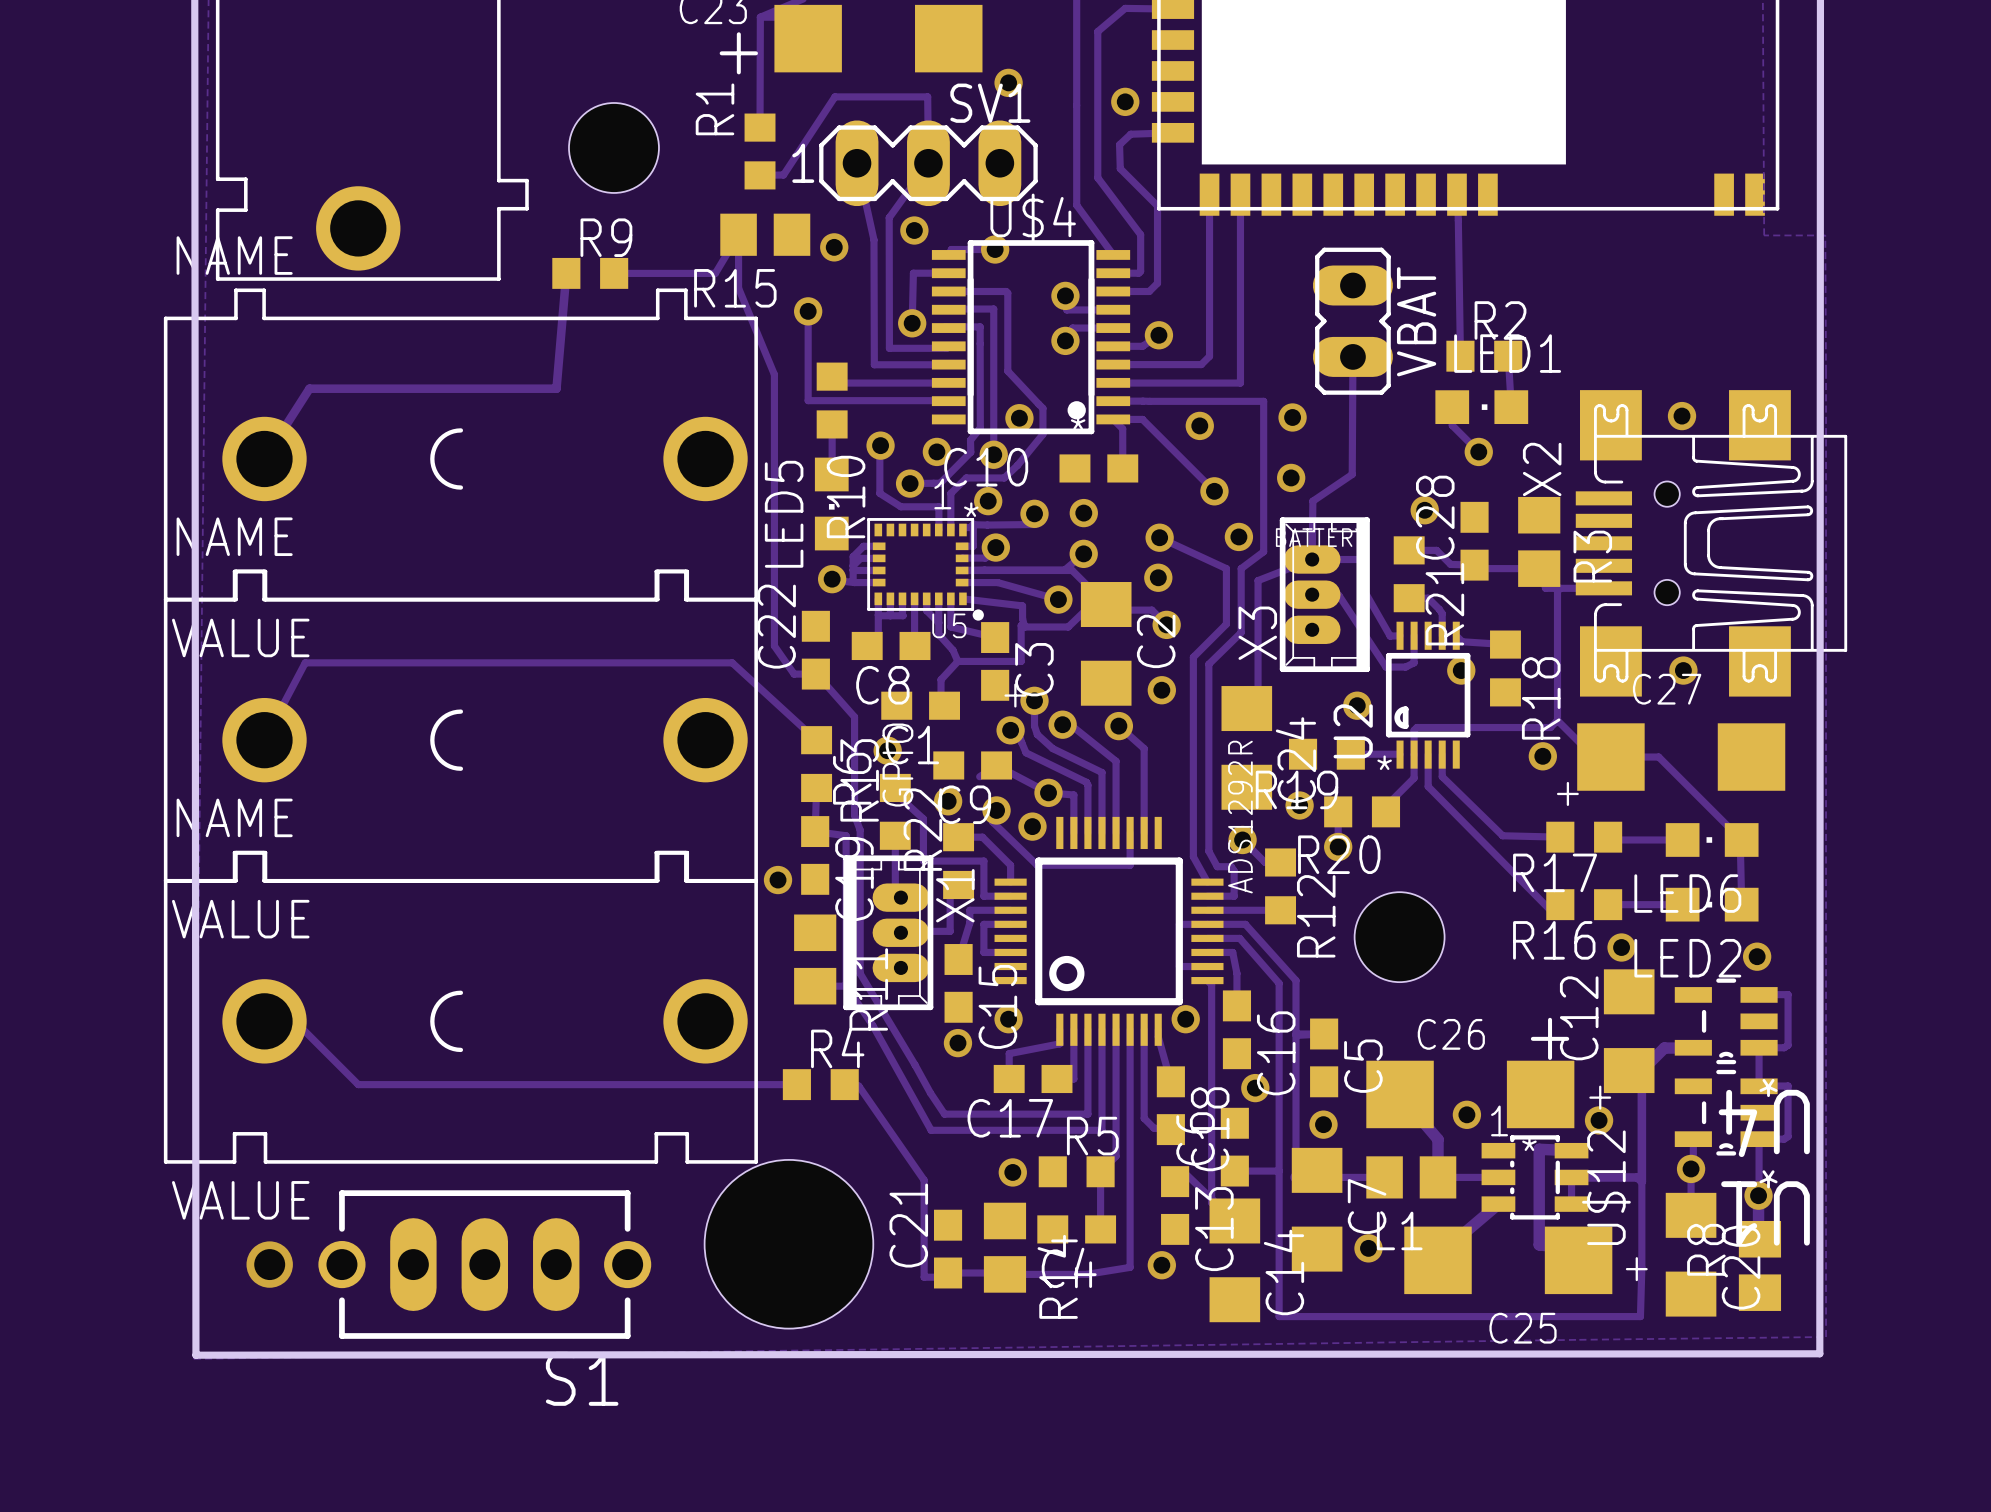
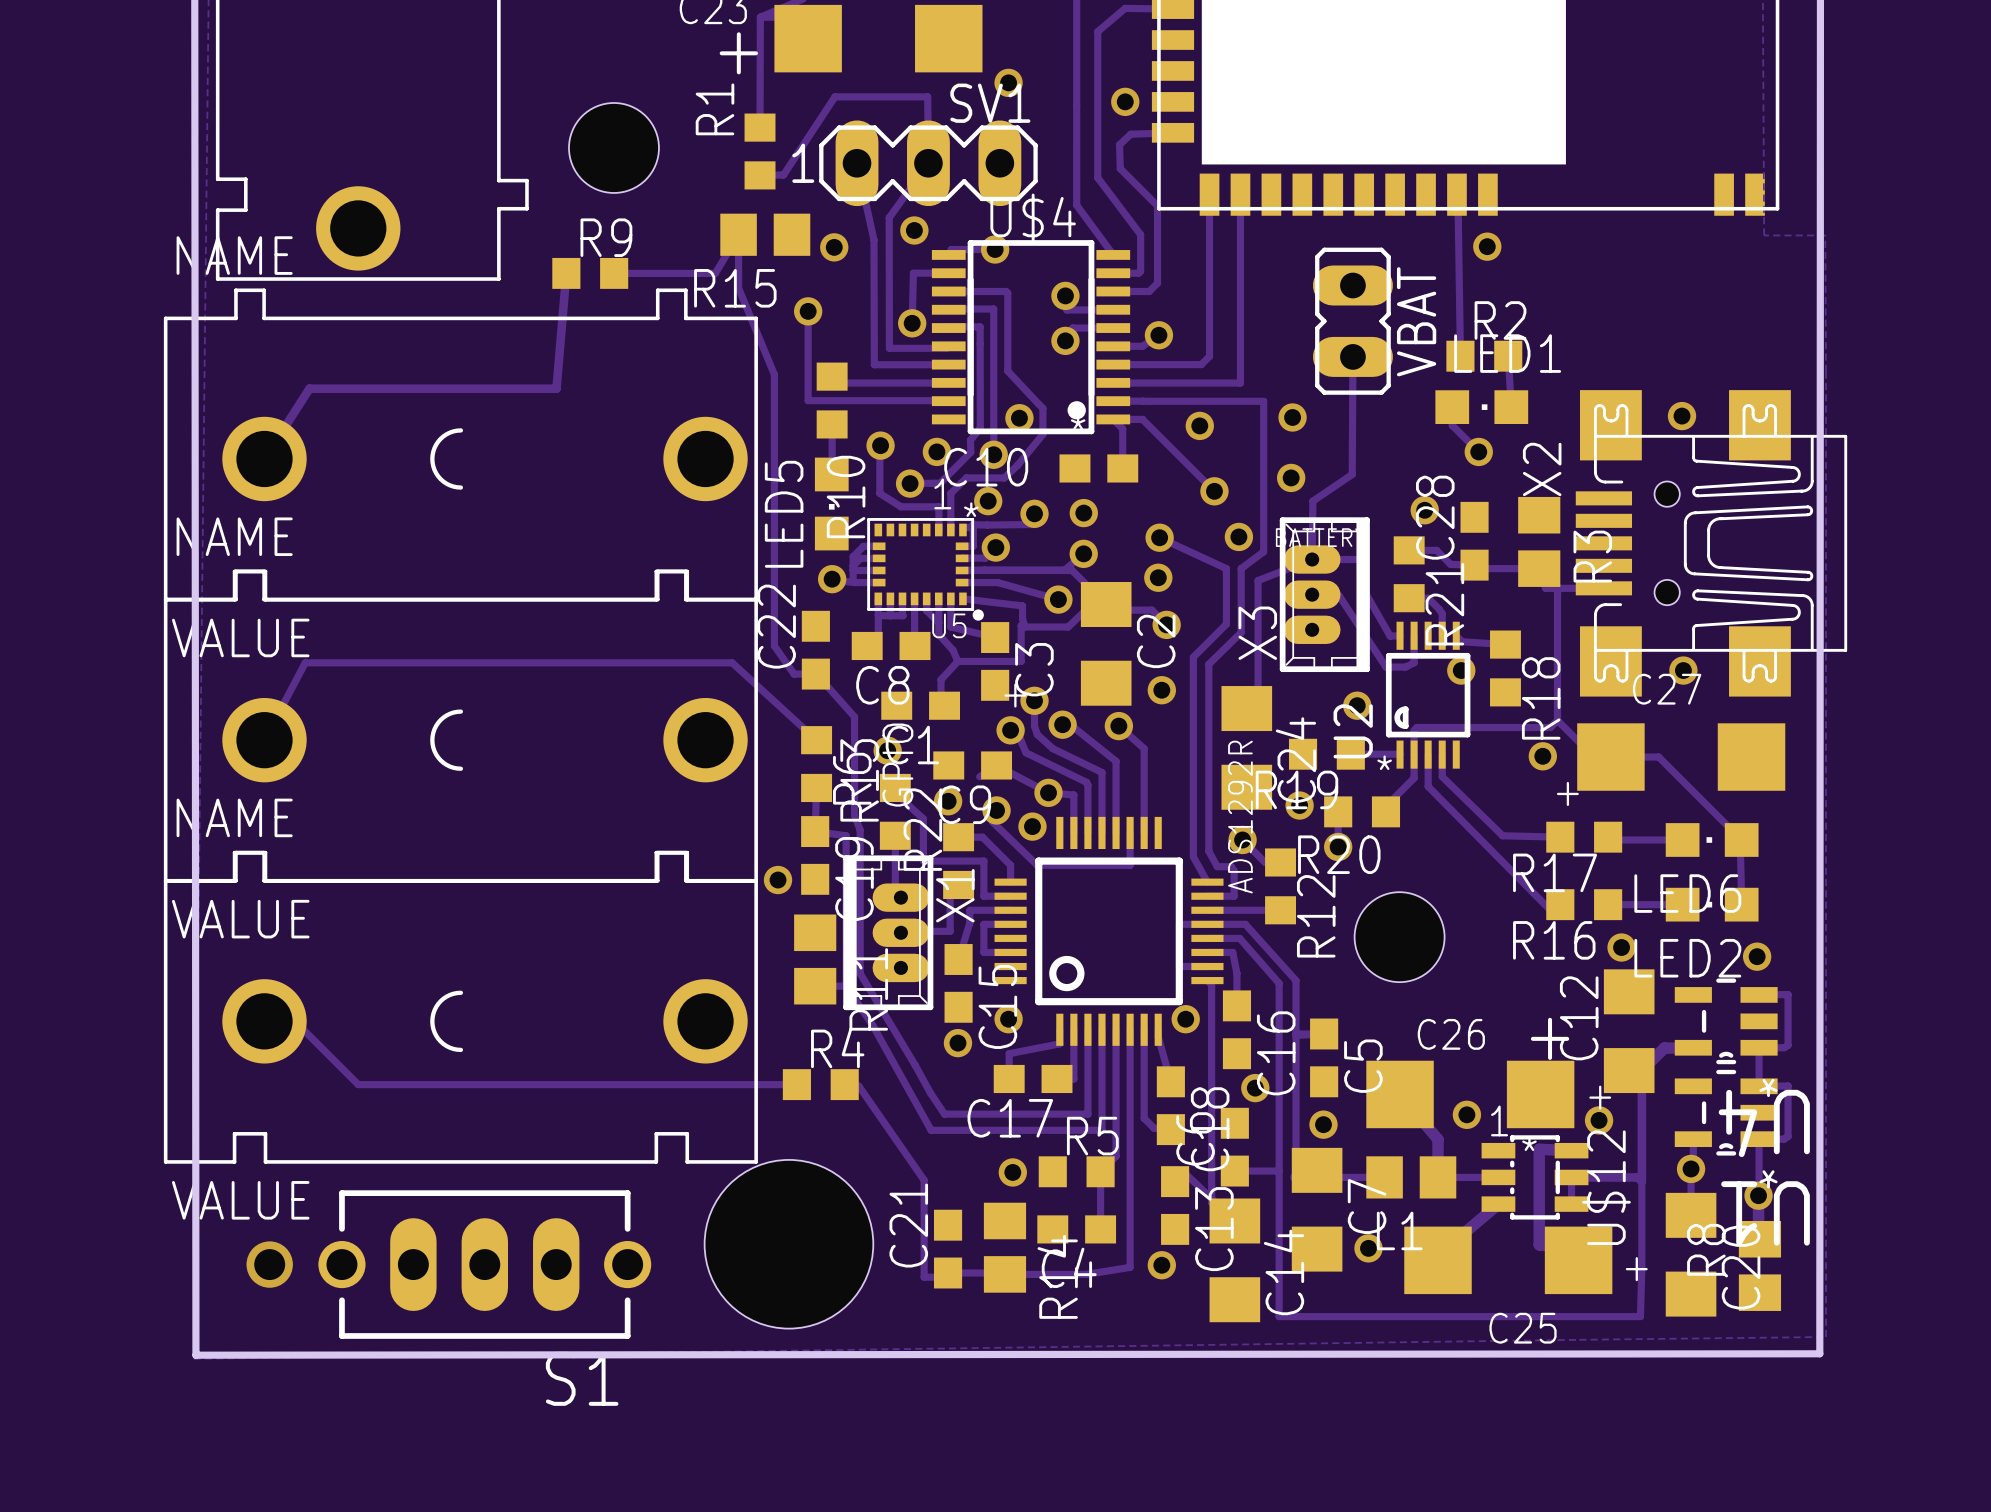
via: none -> (1487, 246)

